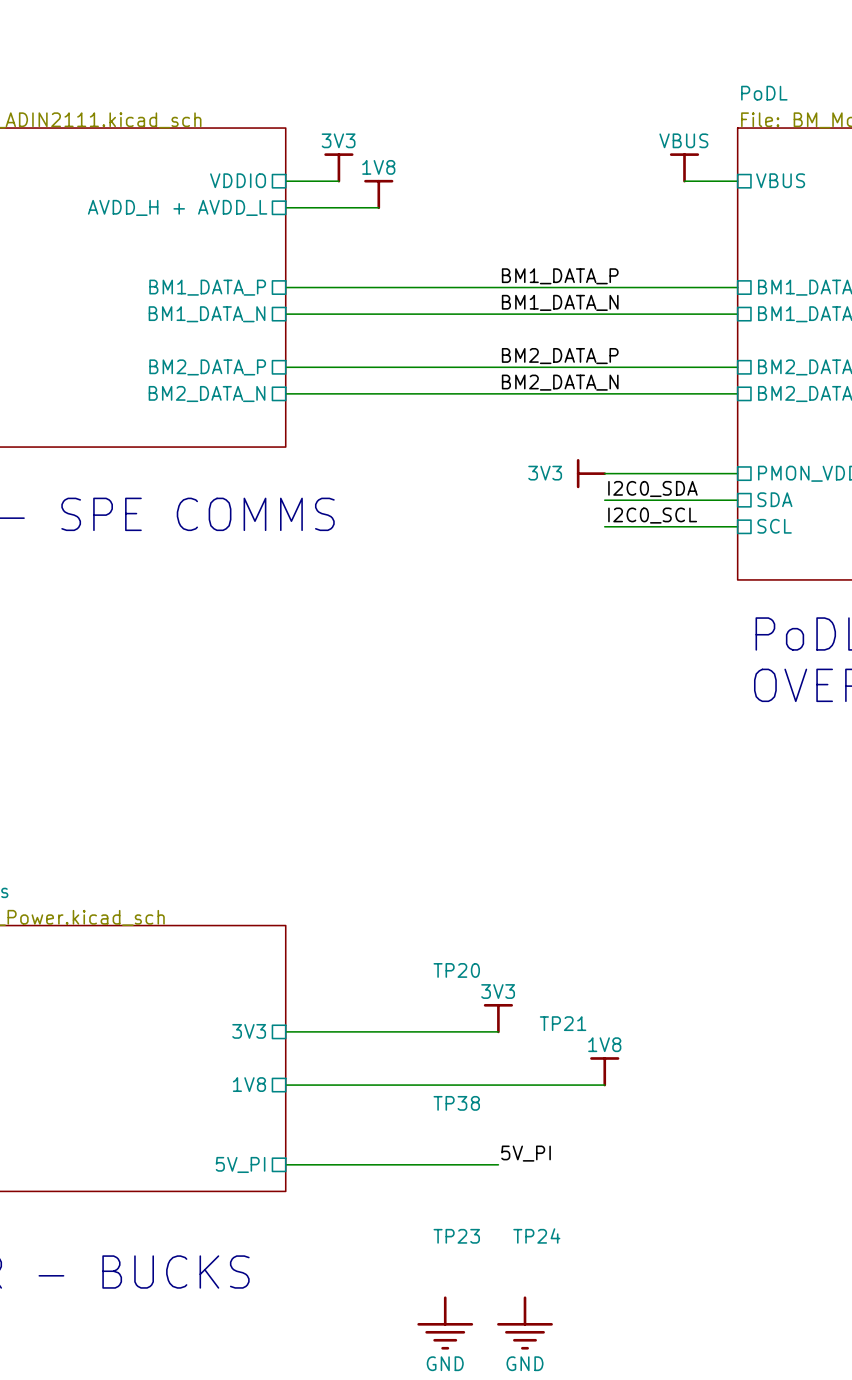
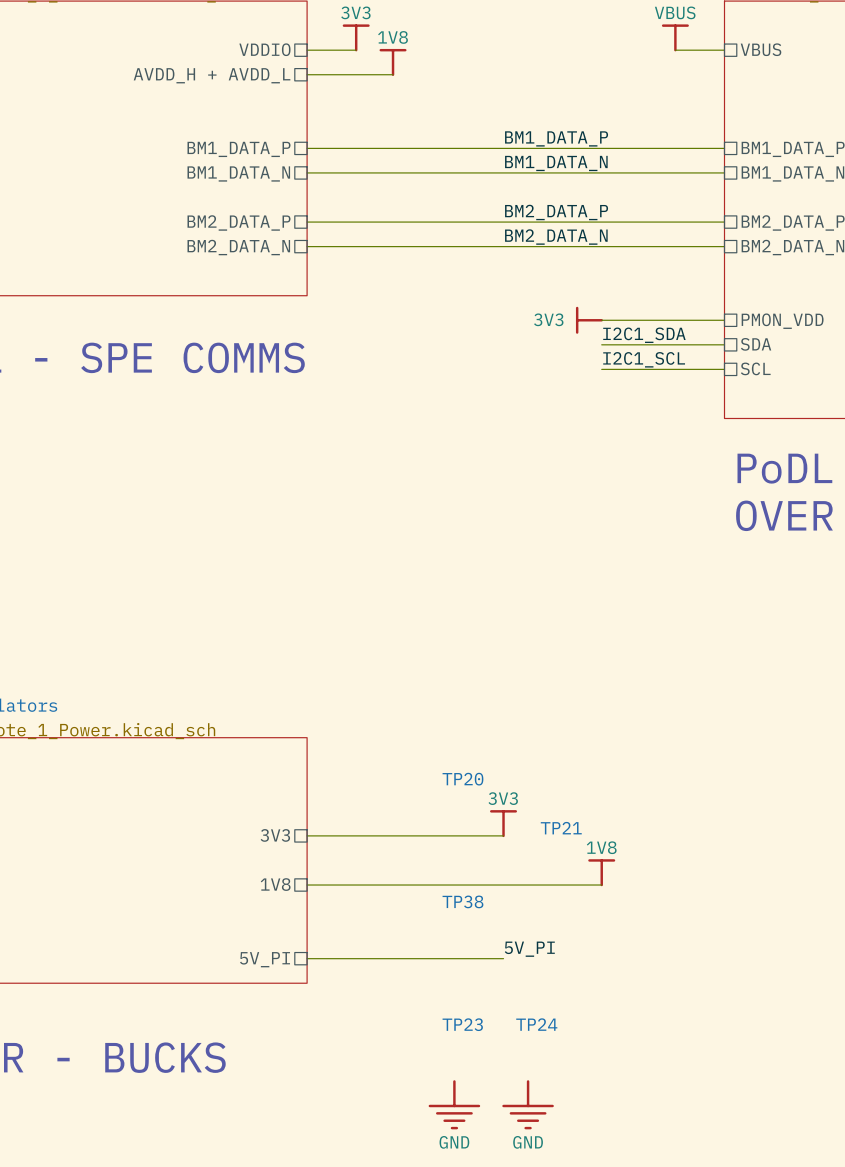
label: I2C0_SDA (652, 488) -> I2C1_SDA (644, 335)
label: I2C0_SCL (652, 515) -> I2C1_SCL (644, 359)

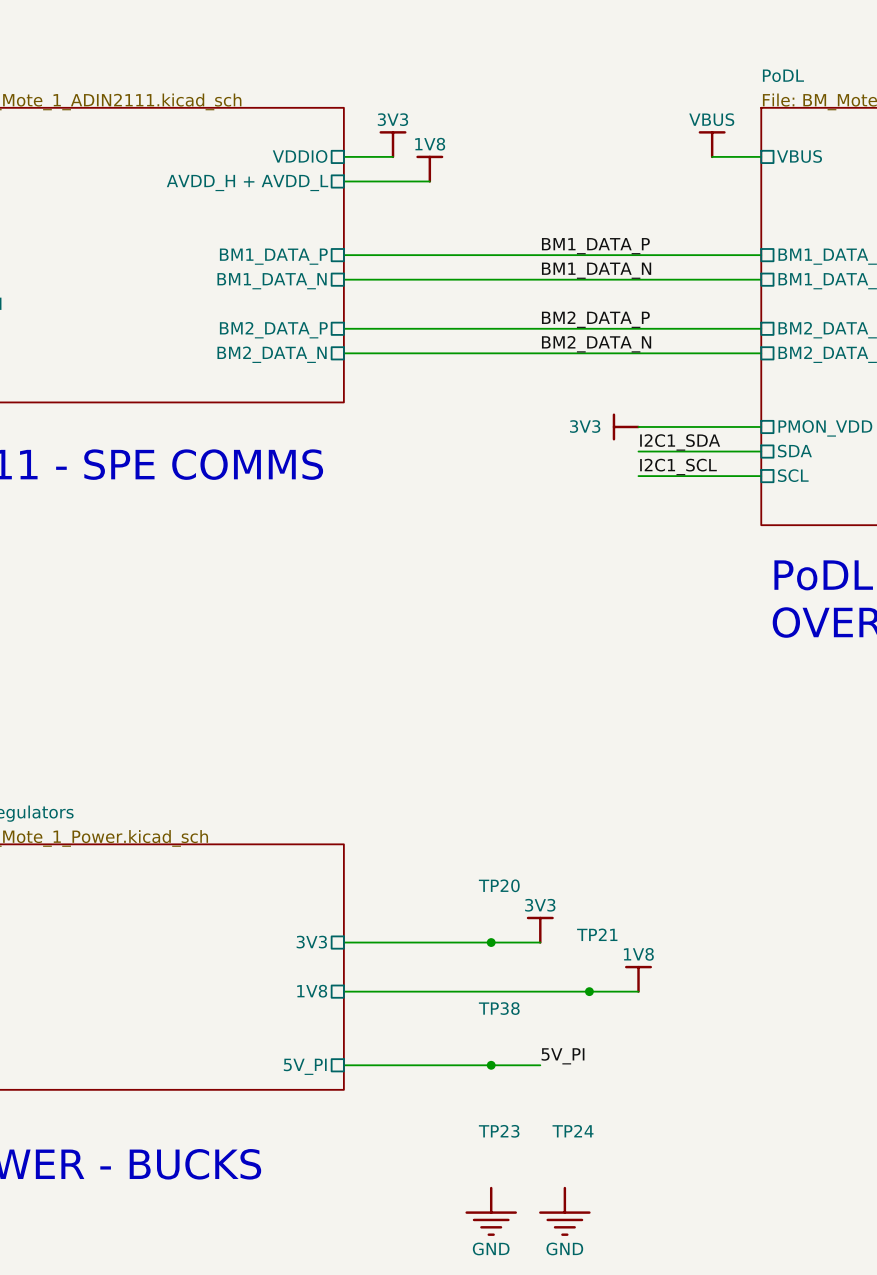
junction: none -> (491, 942)
junction: none -> (589, 991)
junction: none -> (491, 1065)

